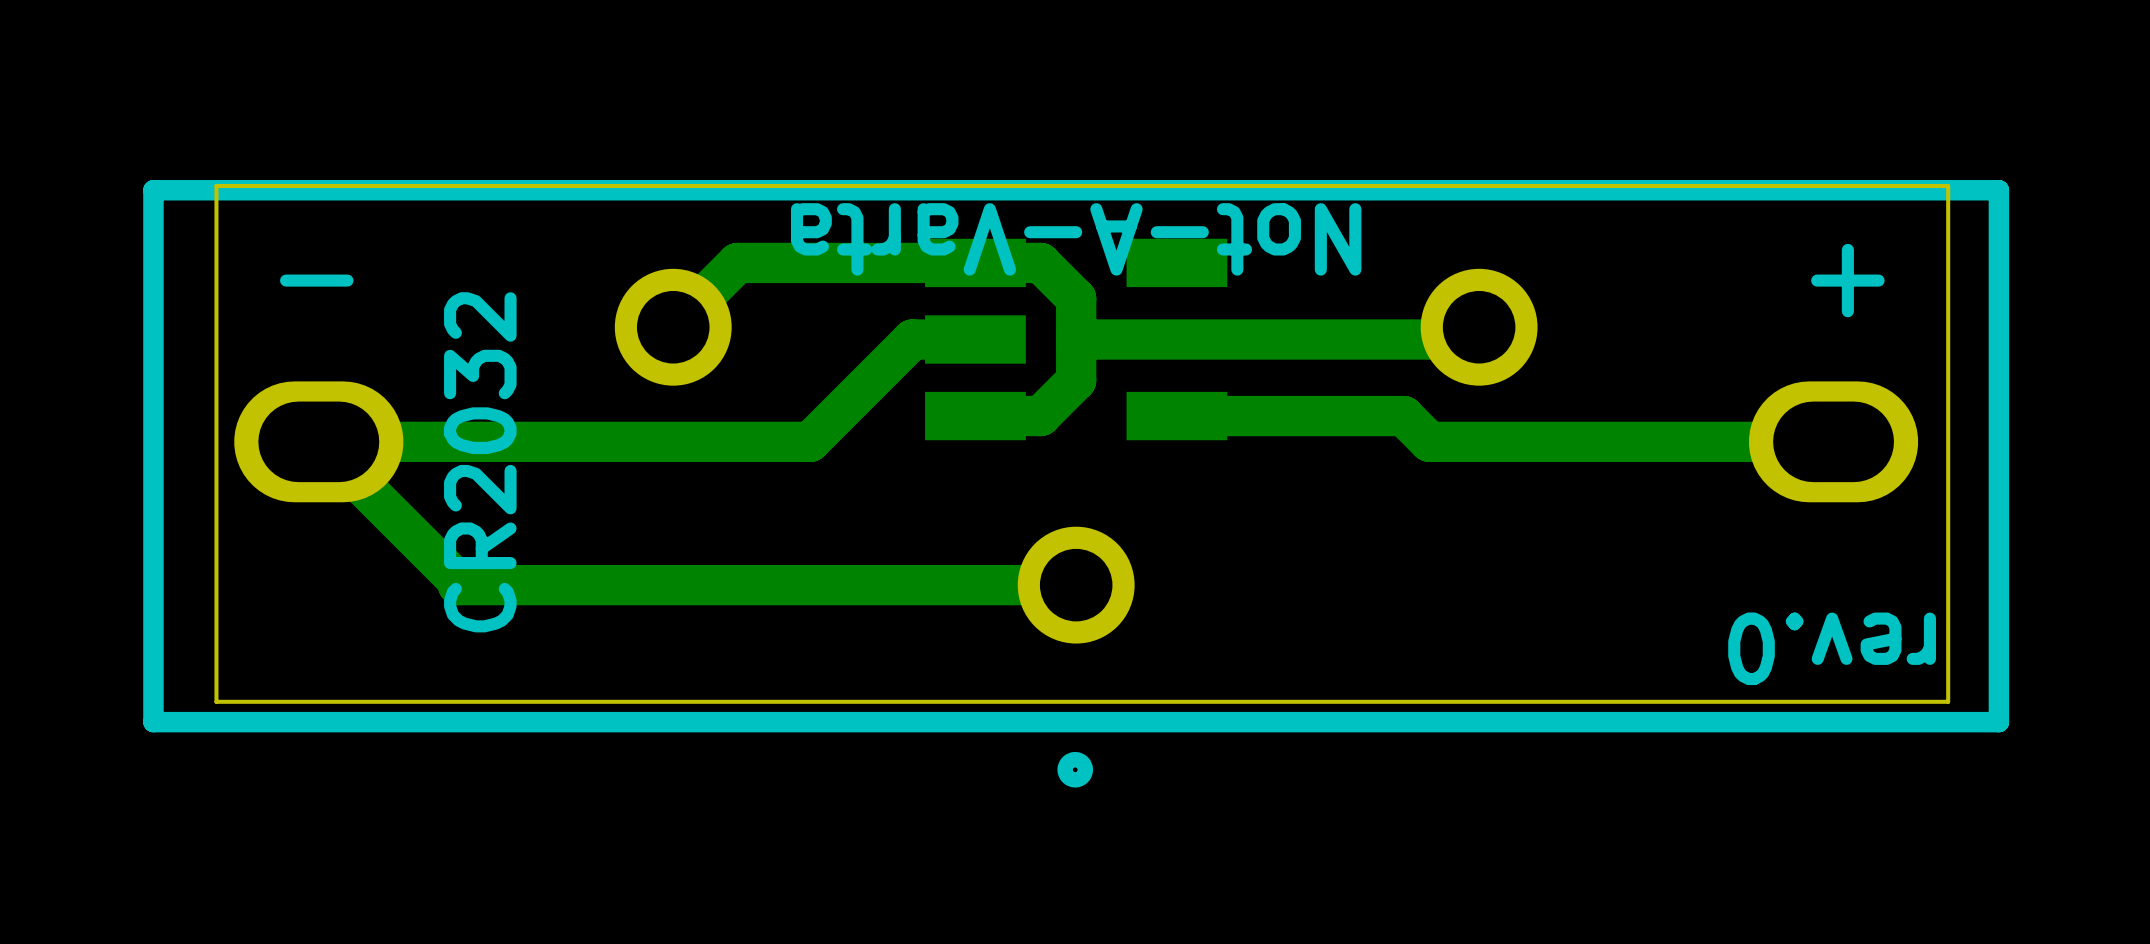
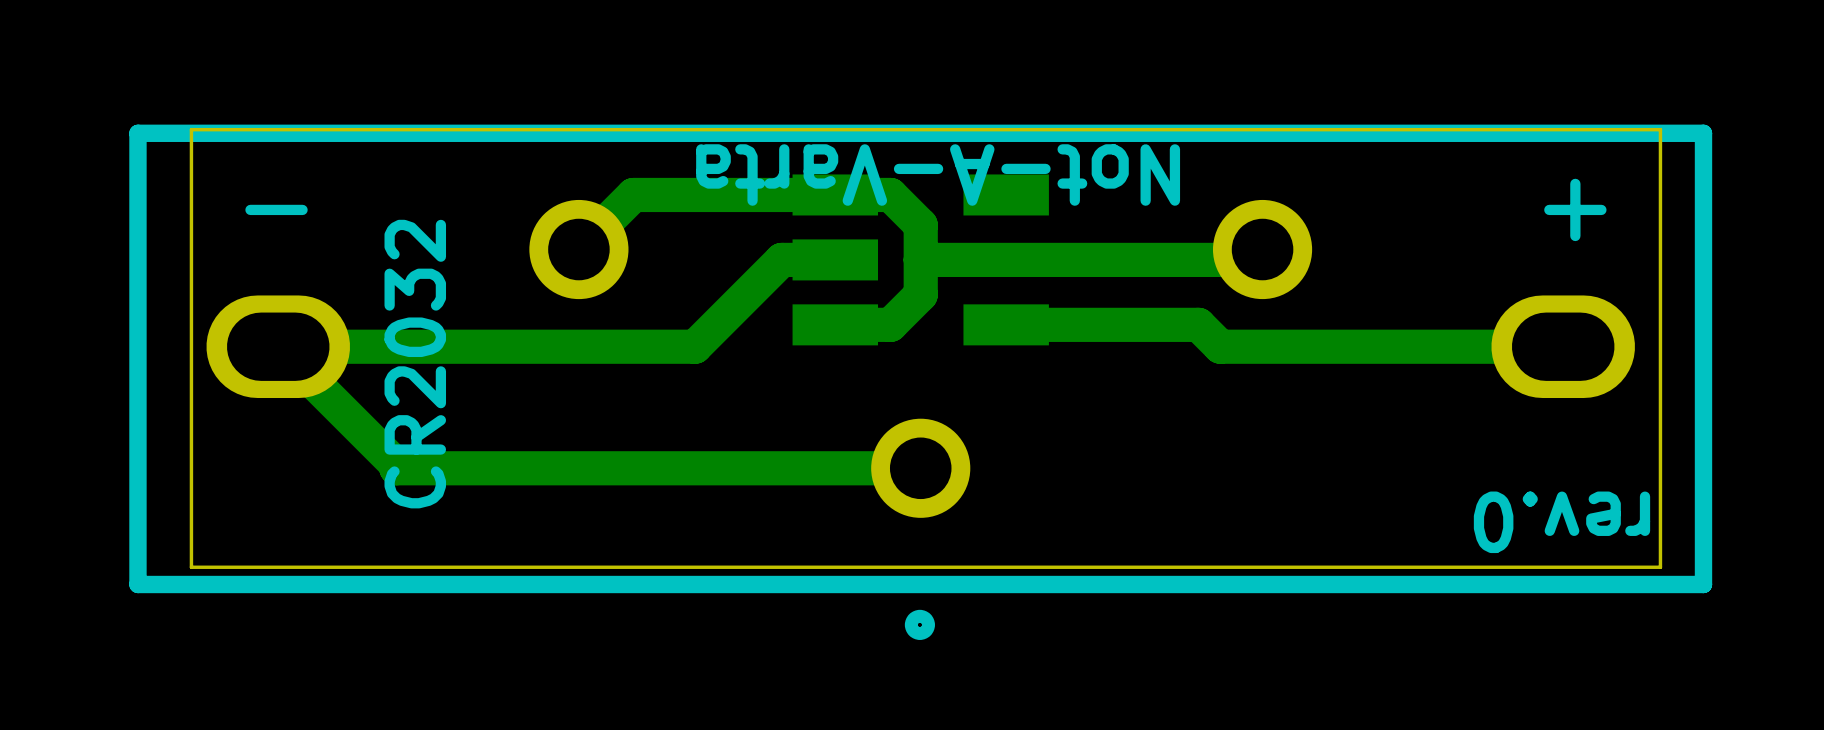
text position: Not-A-Varta (1076, 239) -> Not-A-Varta (938, 175)

